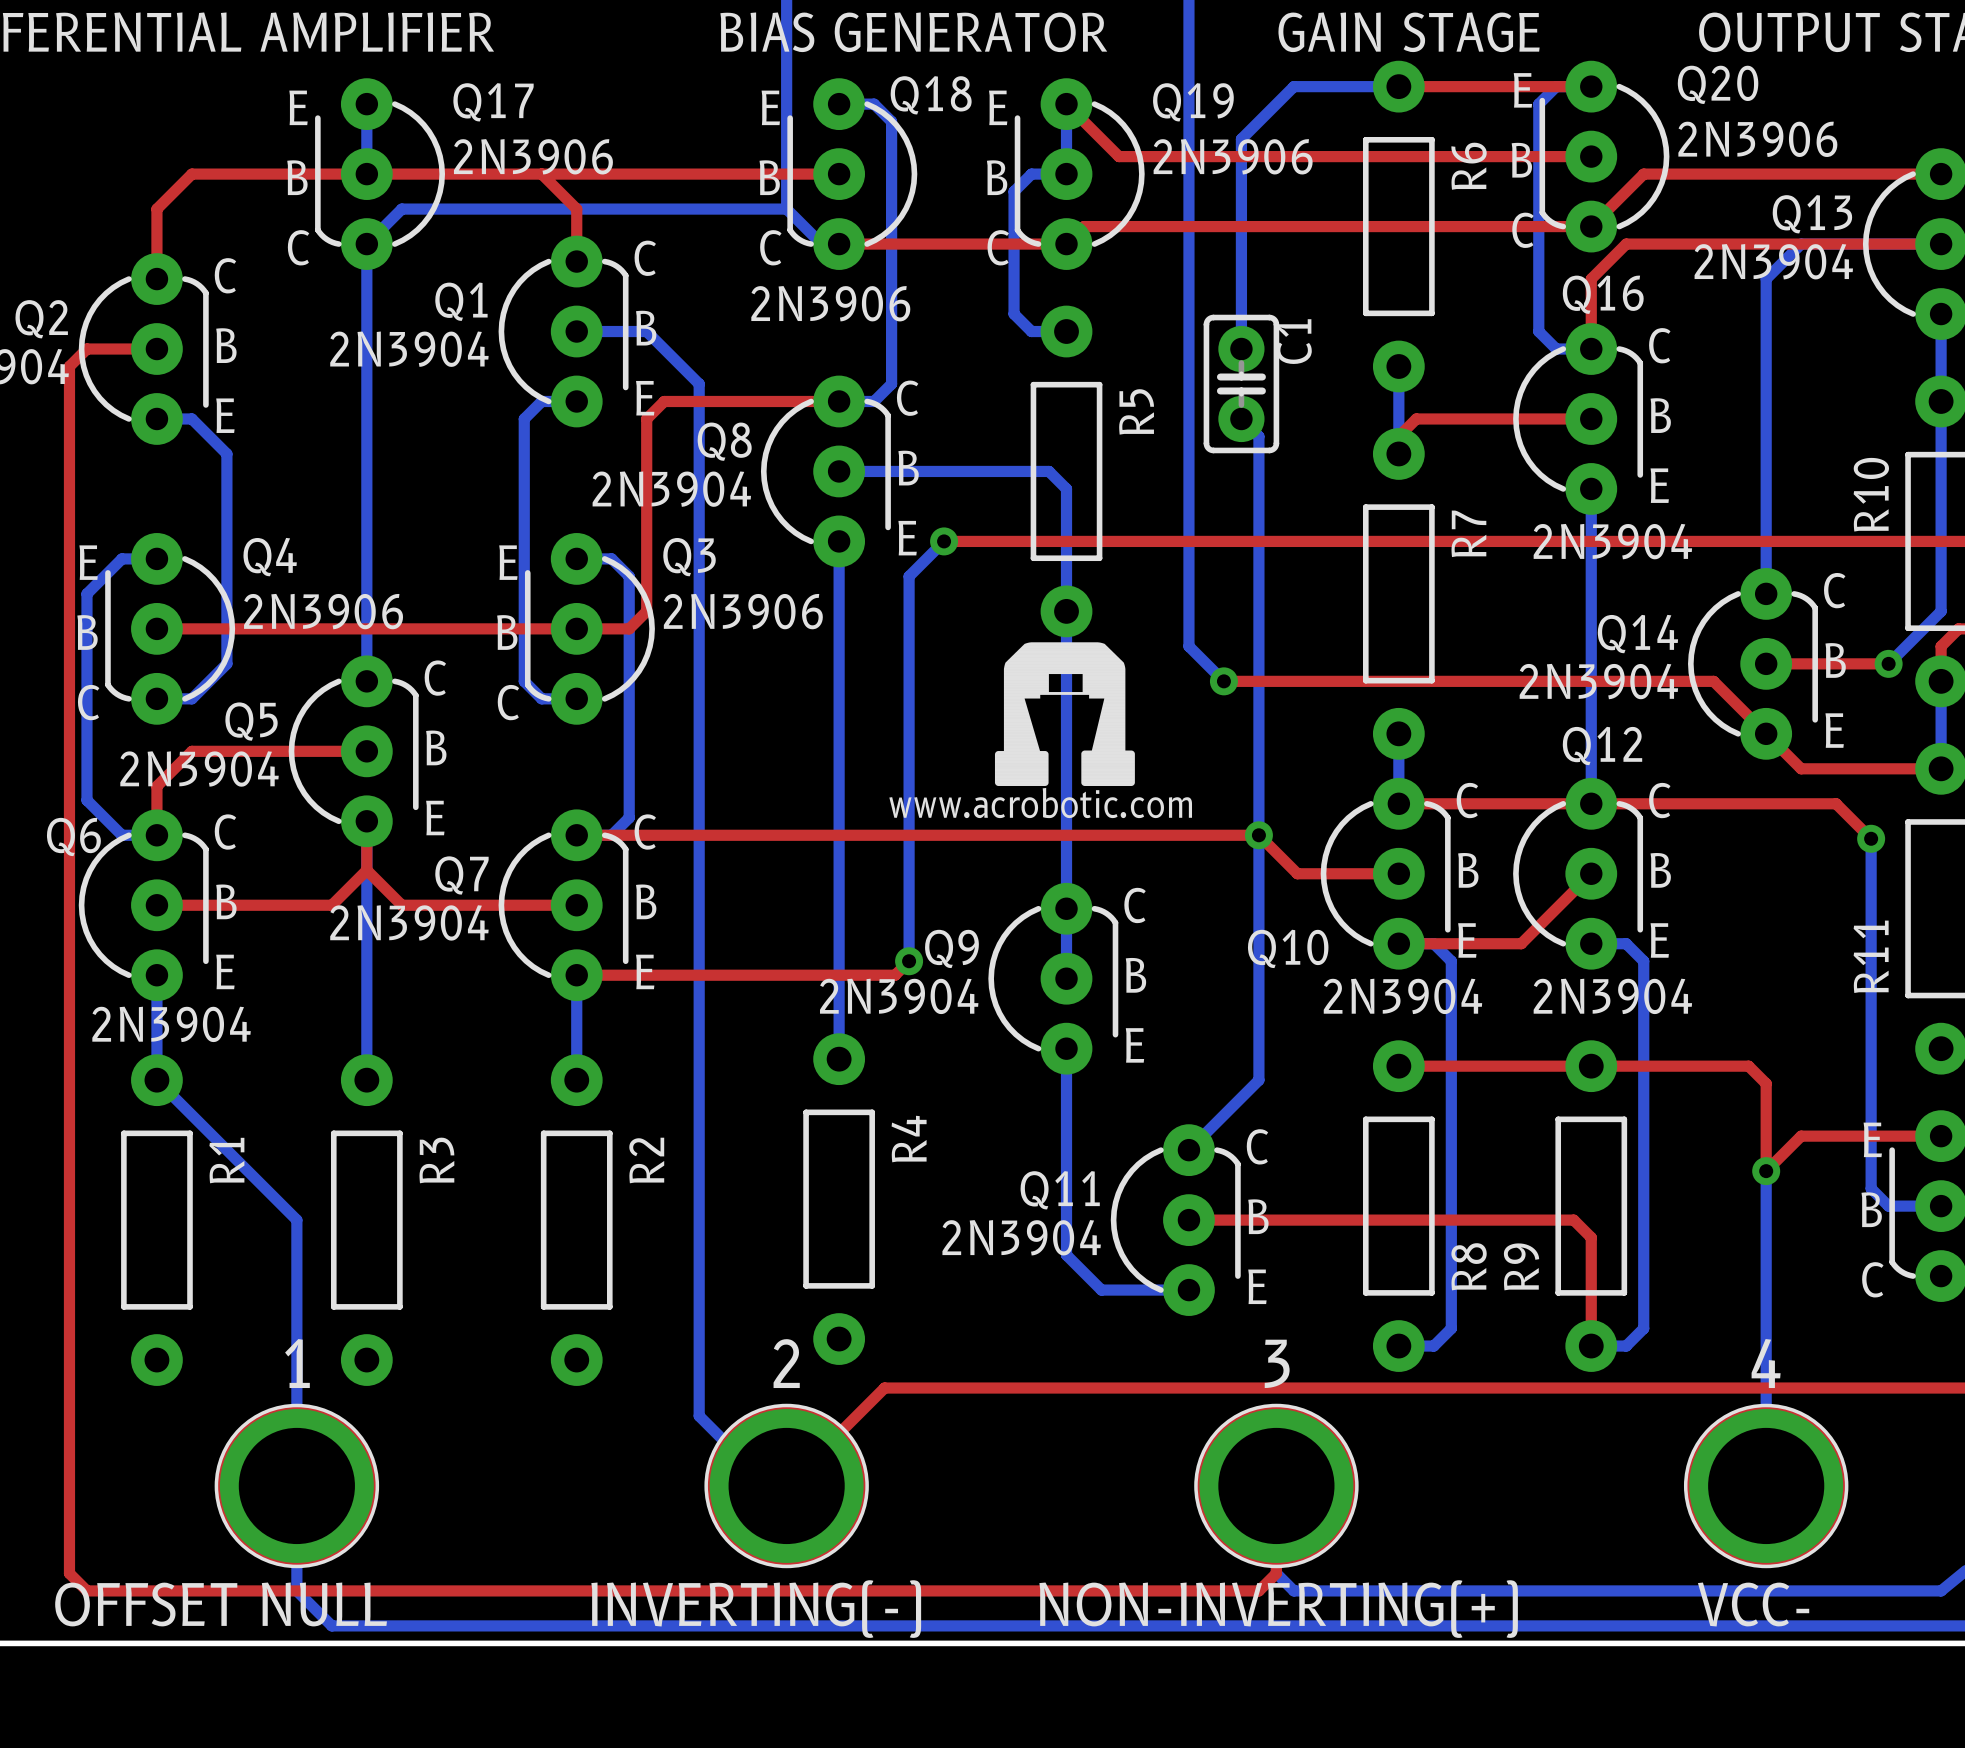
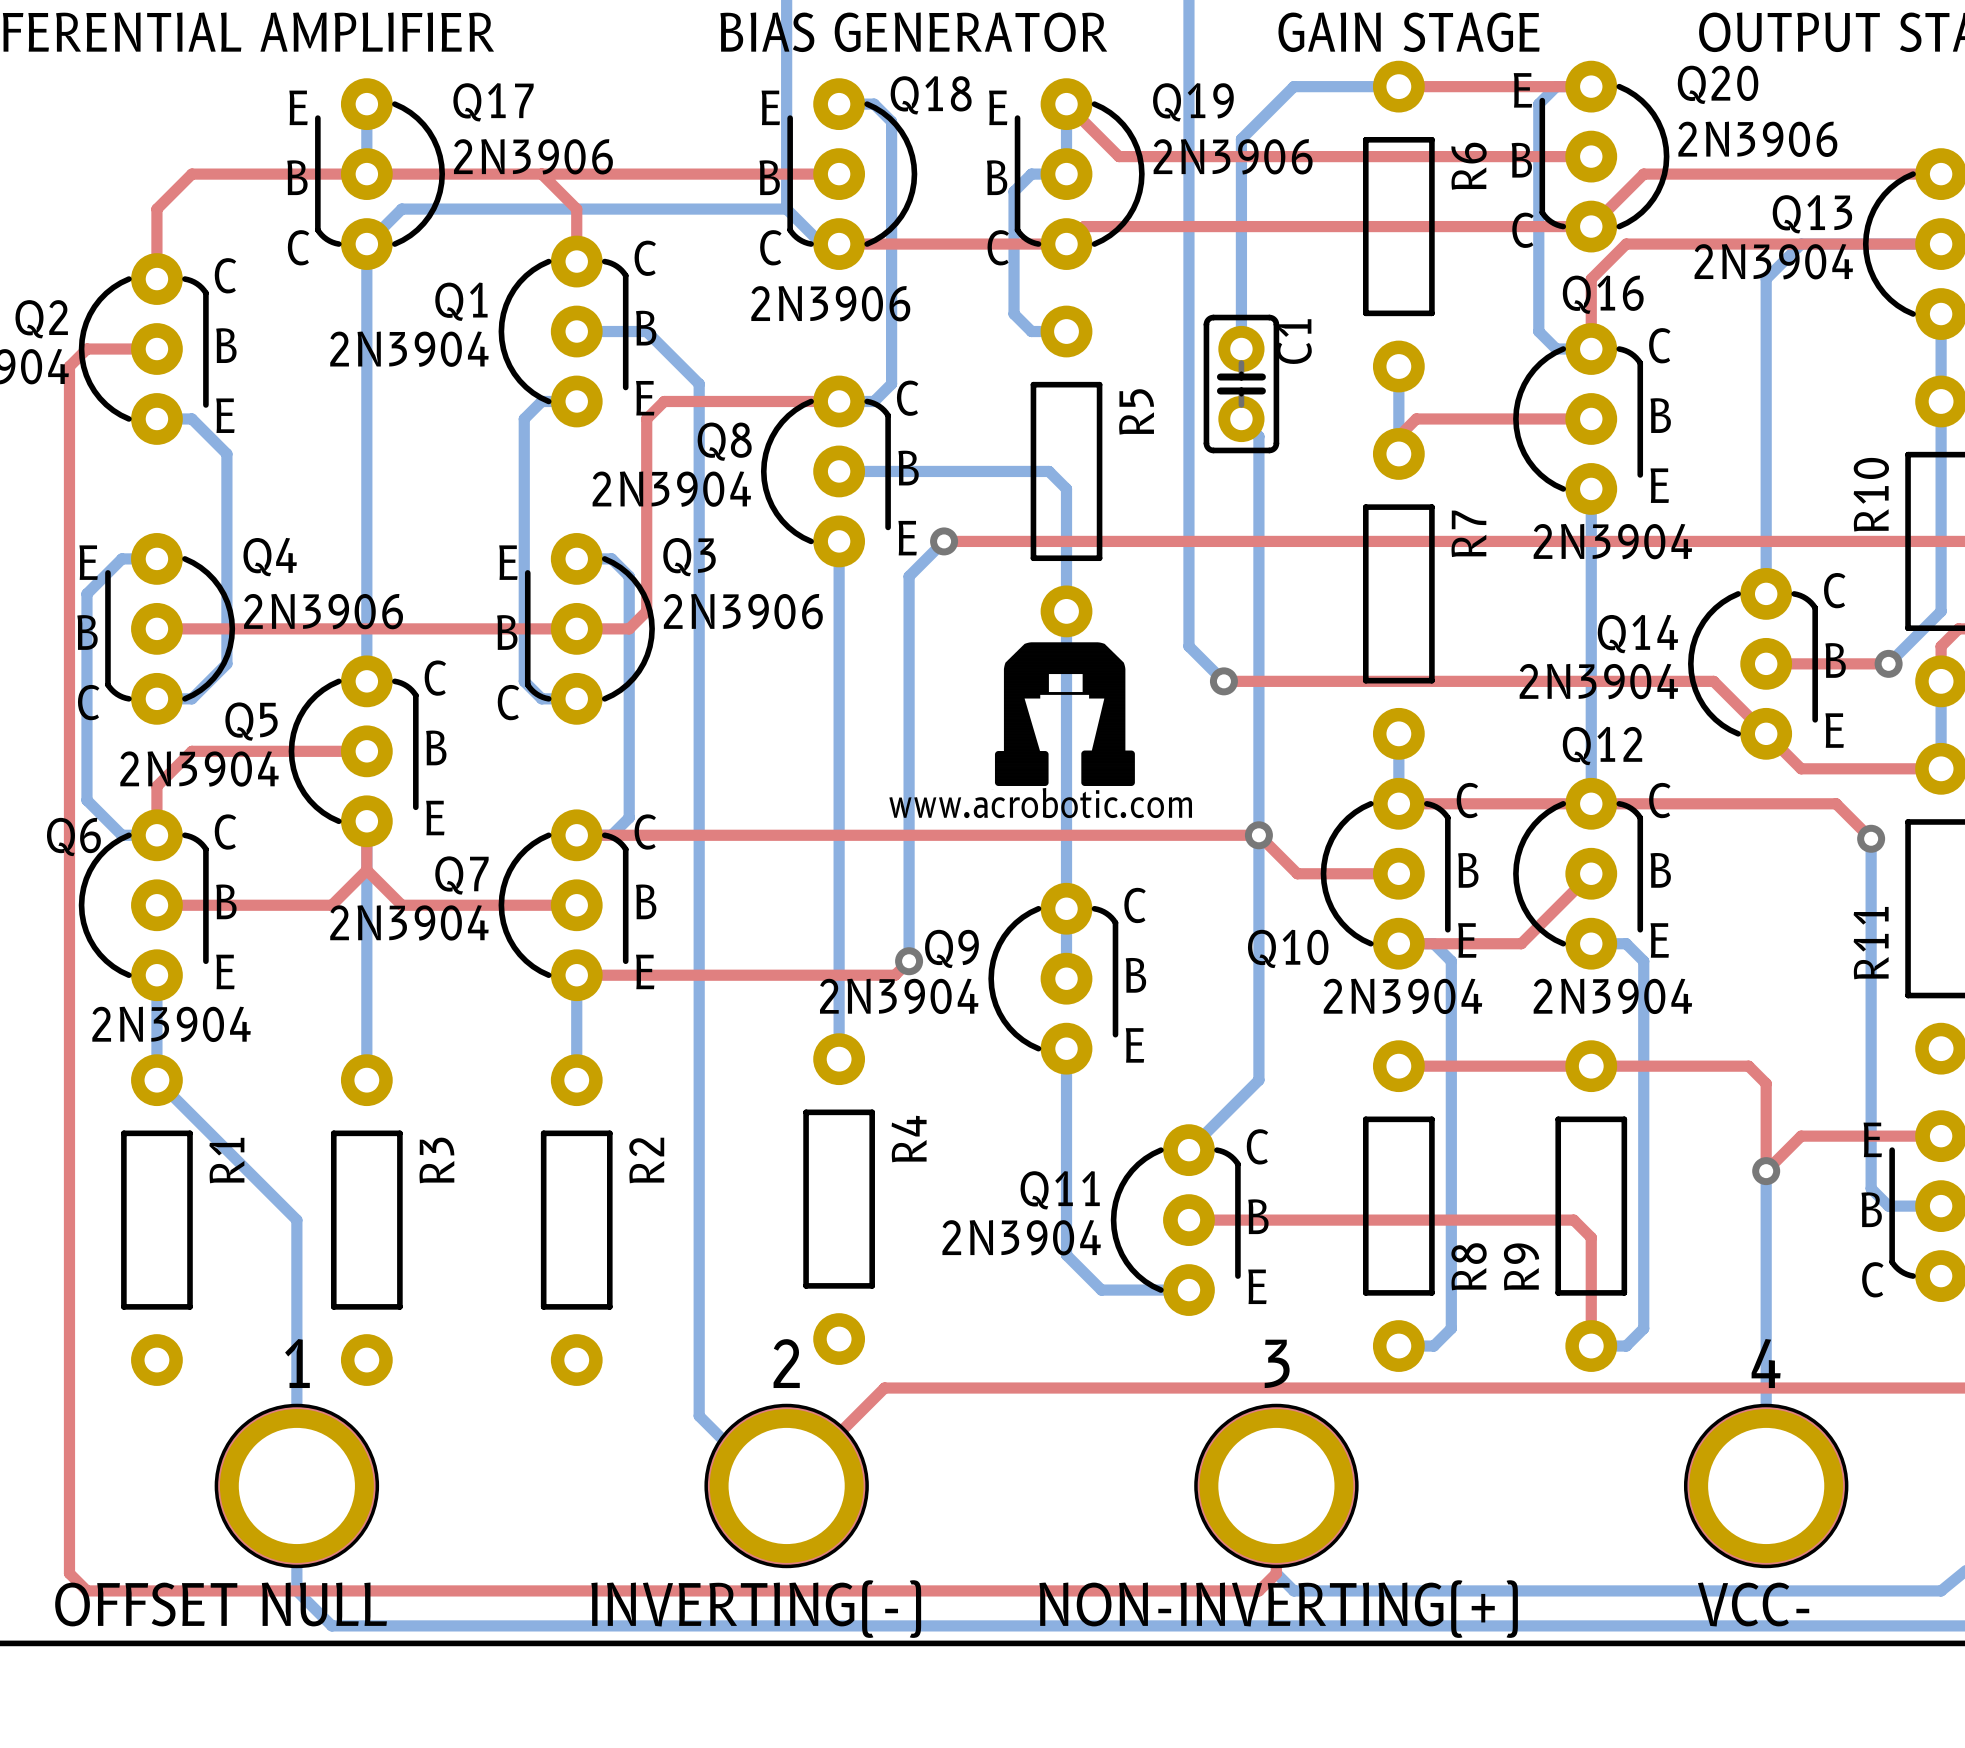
R11 name position: R11 (1871, 956) -> R11 (1871, 943)

